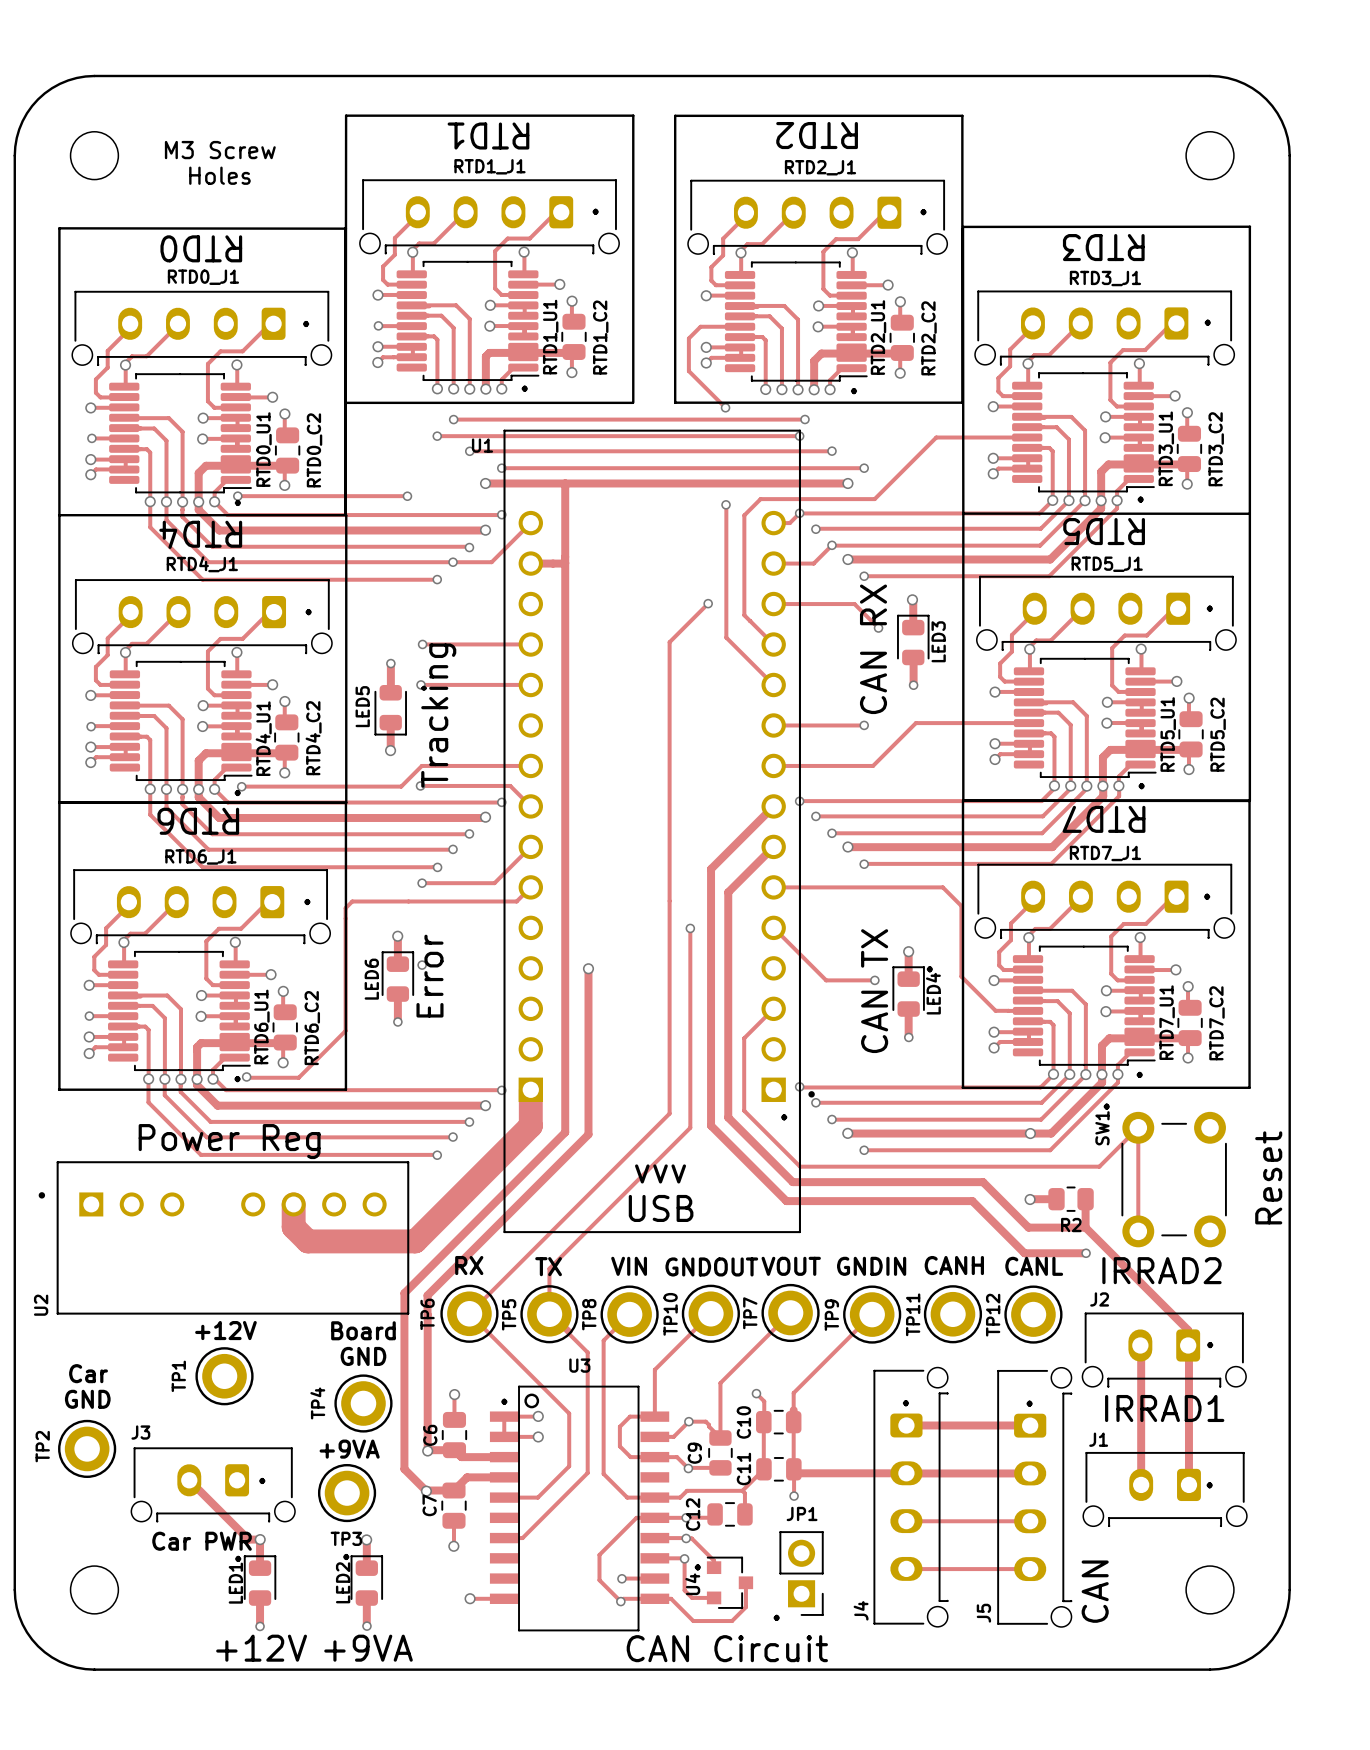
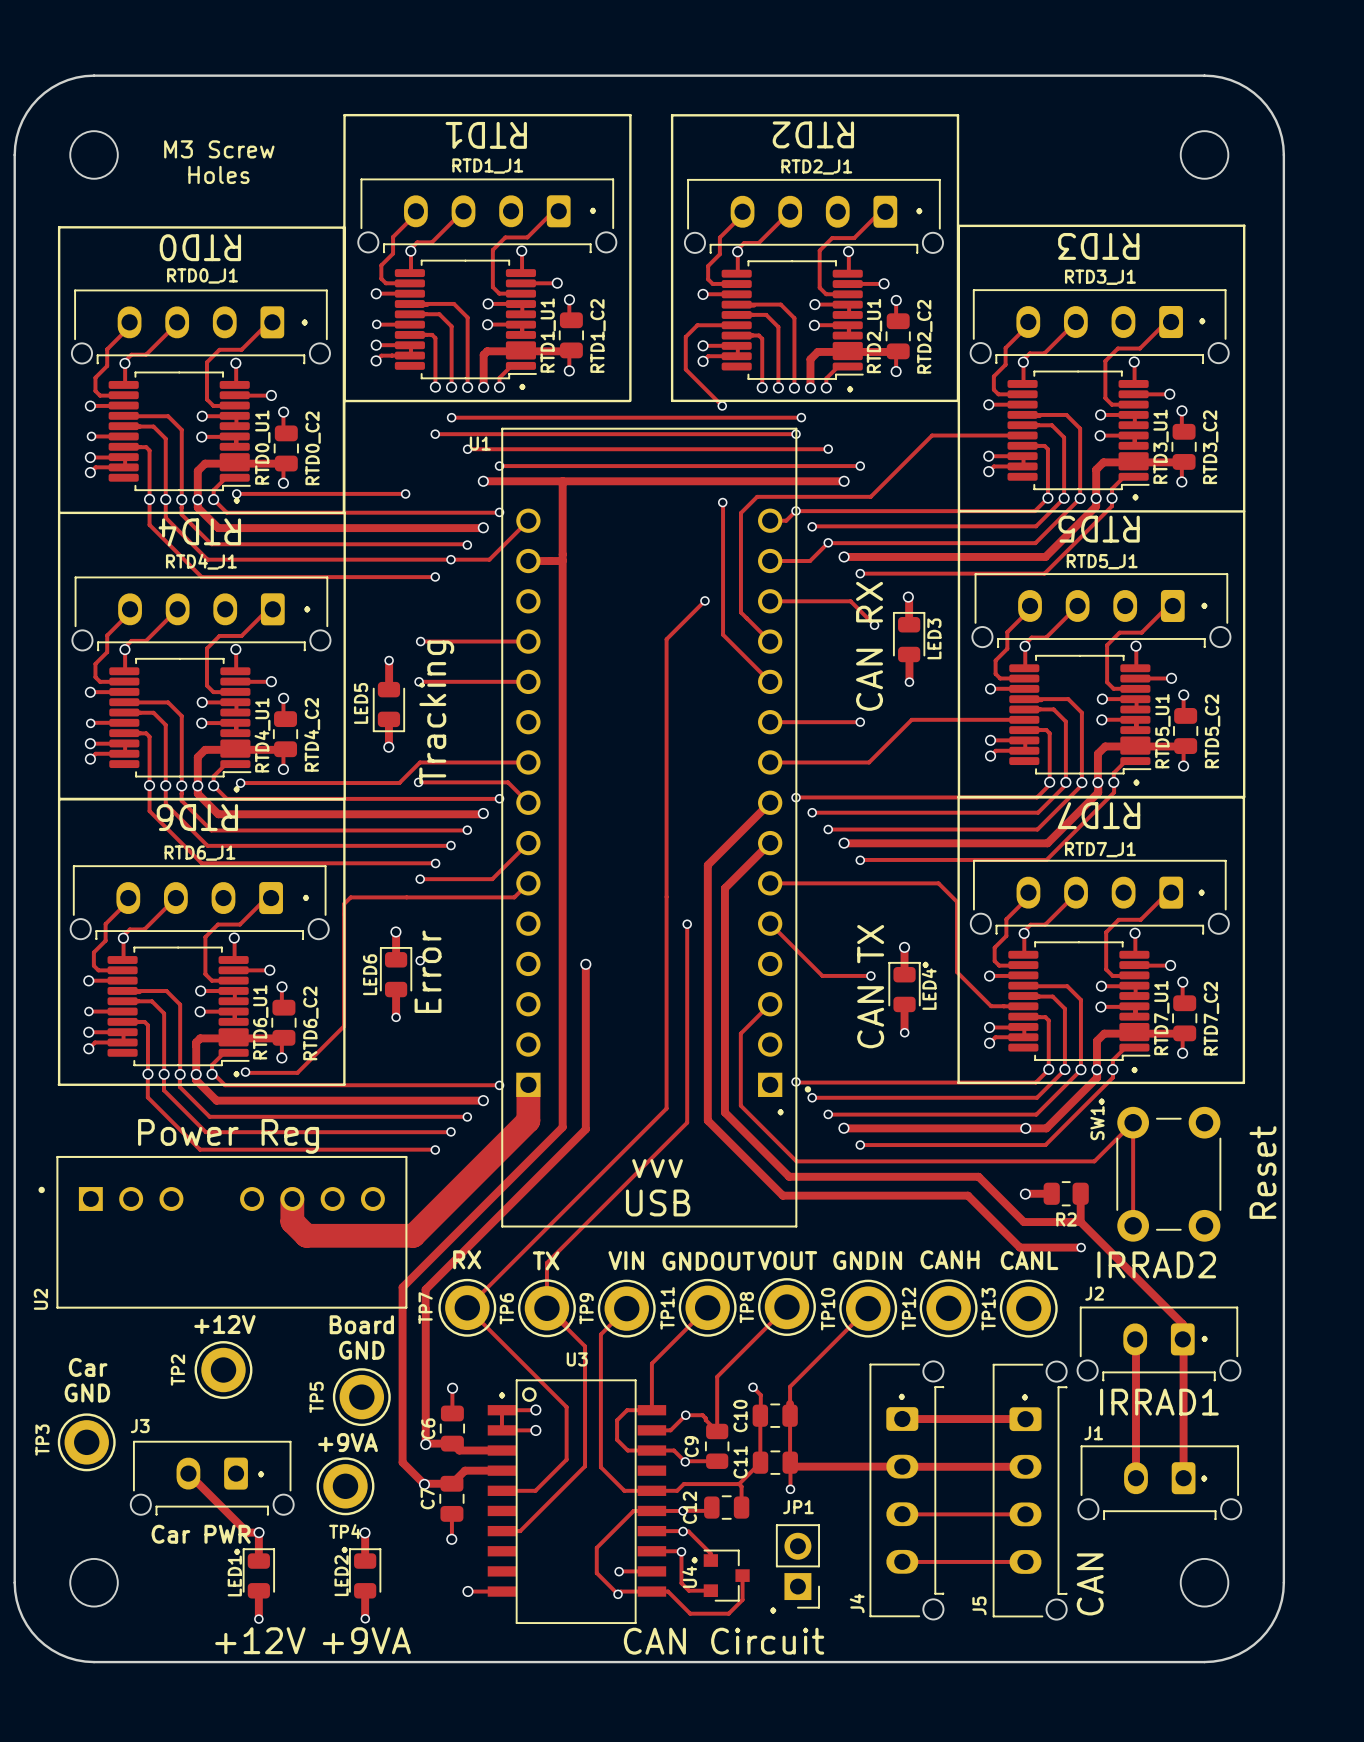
TP7 name: TP7 (750, 1313) -> TP8 (746, 1307)
TP6 name: TP6 (427, 1314) -> TP7 (425, 1308)
TP5 name: TP5 (509, 1314) -> TP6 (506, 1308)
TP8 name: TP8 (589, 1314) -> TP9 (586, 1308)
TP10 name: TP10 (670, 1314) -> TP11 (667, 1308)
TP11 name: TP11 (913, 1314) -> TP12 (909, 1308)
TP9 name: TP9 (831, 1315) -> TP10 (828, 1309)
TP12 name: TP12 (993, 1315) -> TP13 (988, 1309)
TP1 name: TP1 (178, 1376) -> TP2 (177, 1370)
TP4 name: TP4 (317, 1403) -> TP5 (316, 1397)
TP2 name: TP2 (42, 1446) -> TP3 (42, 1440)
TP3 name: TP3 (346, 1538) -> TP4 (345, 1531)

